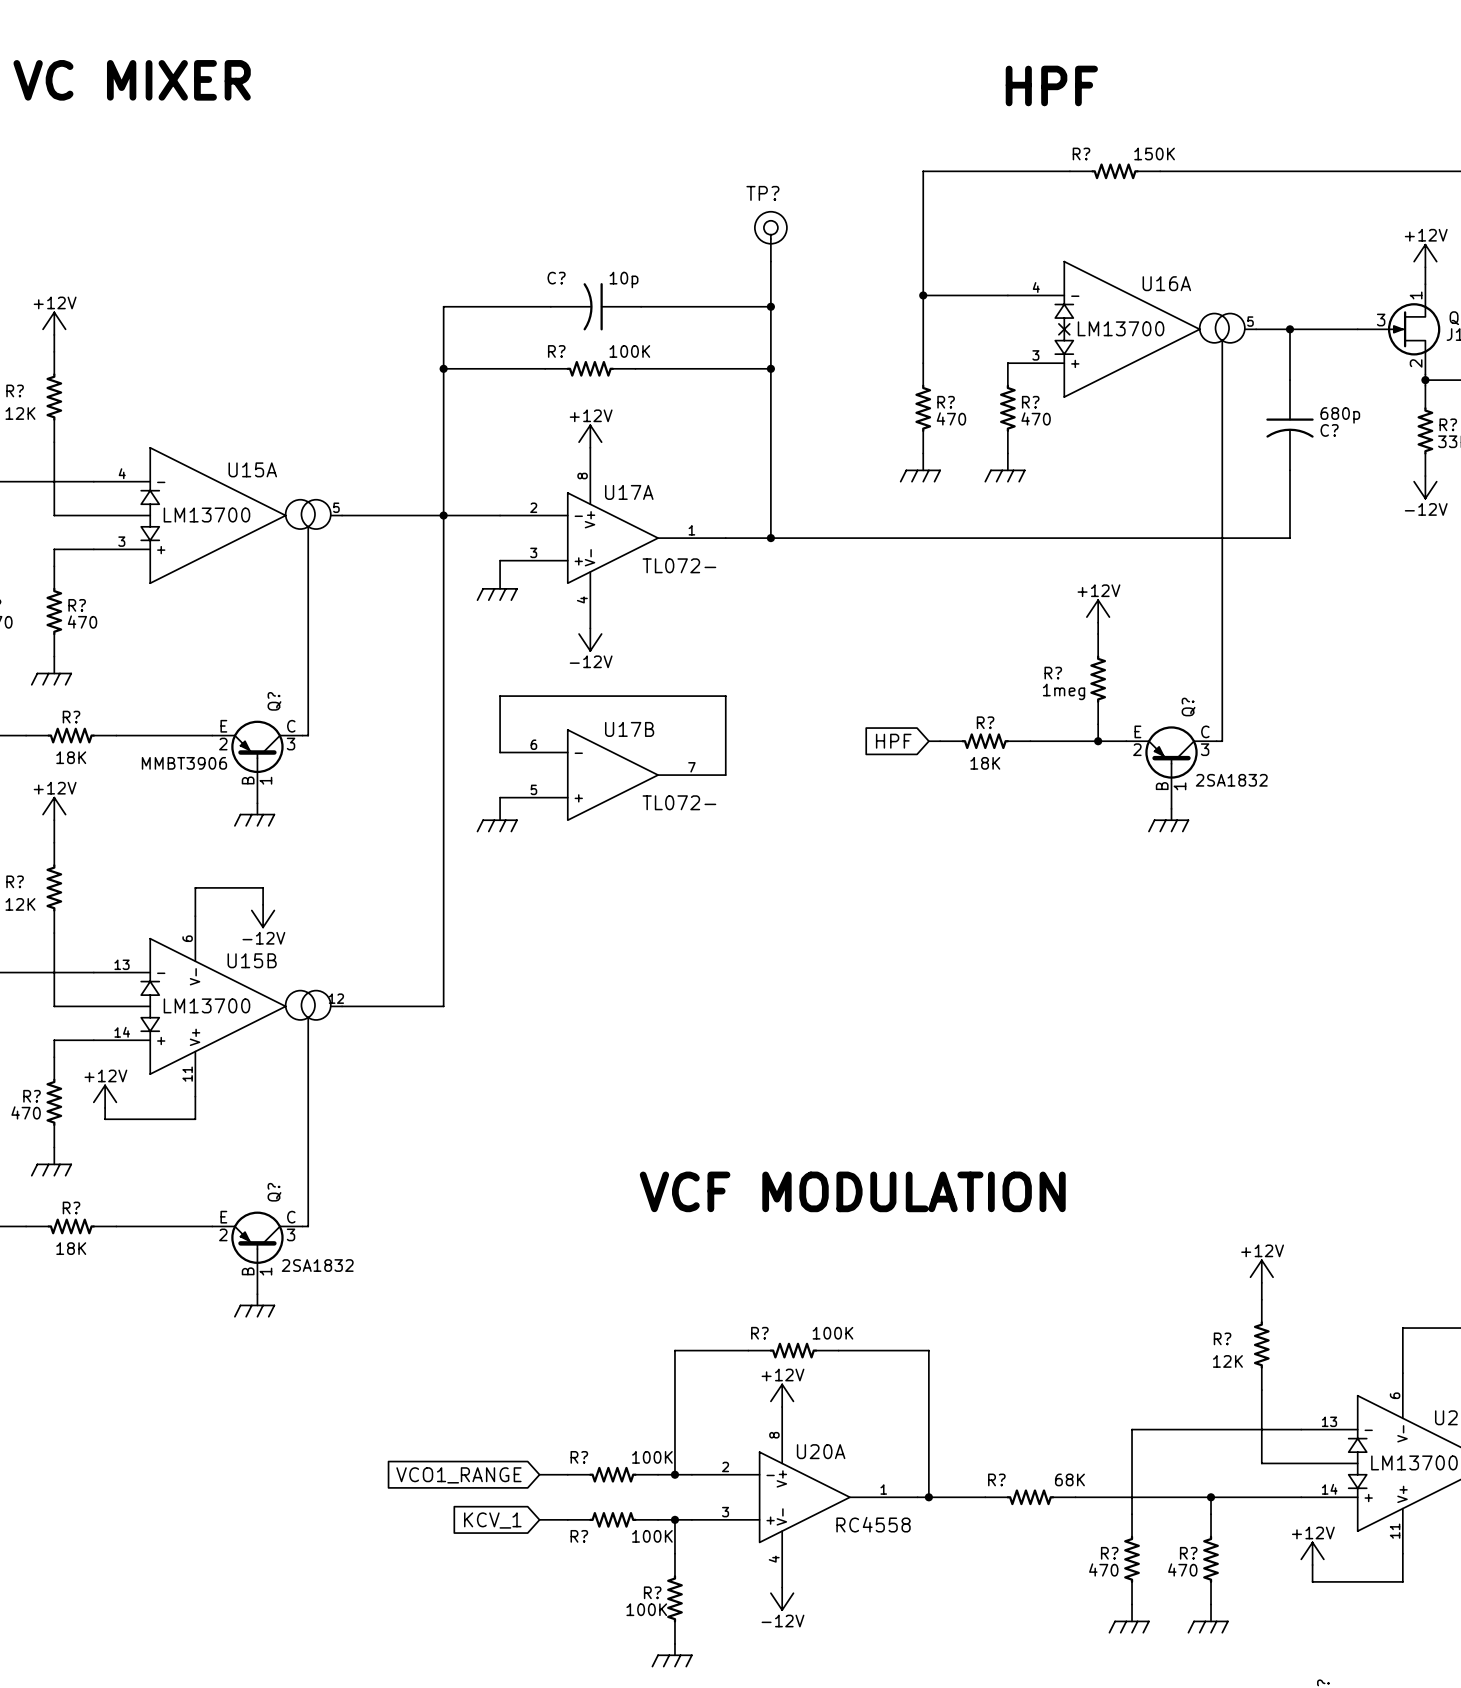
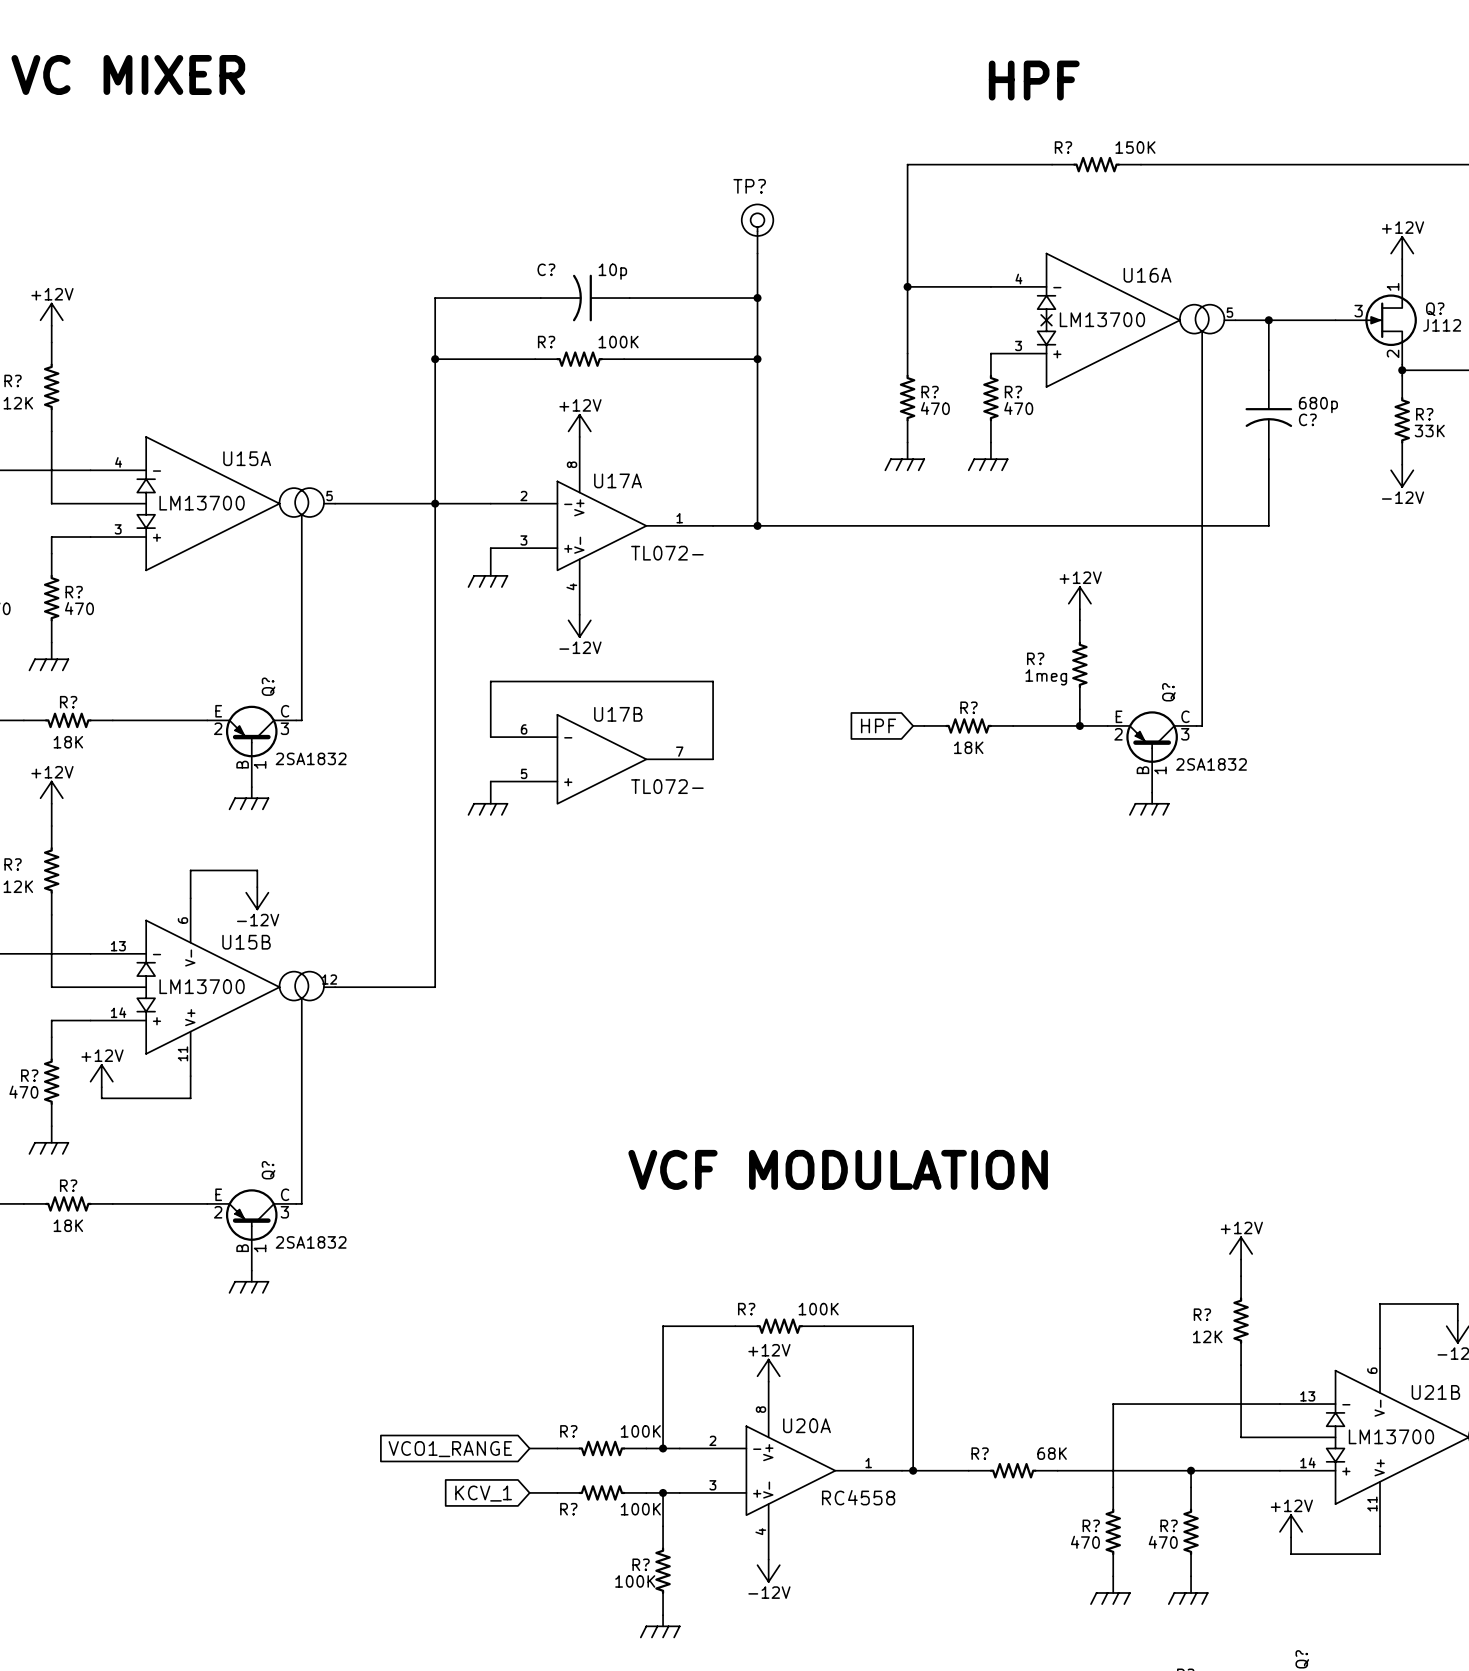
Q? value: MMBT3906 (184, 763) -> 2SA1832 (311, 758)

